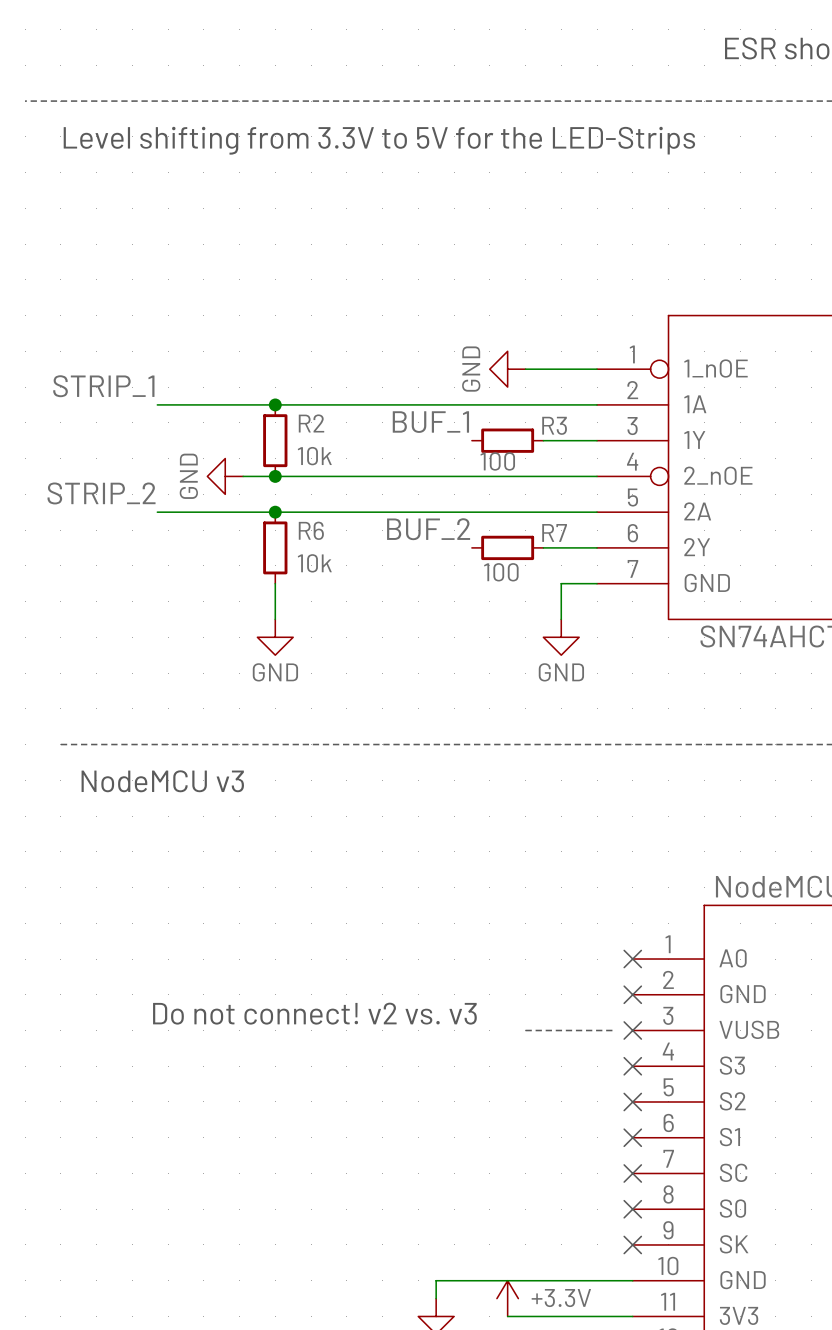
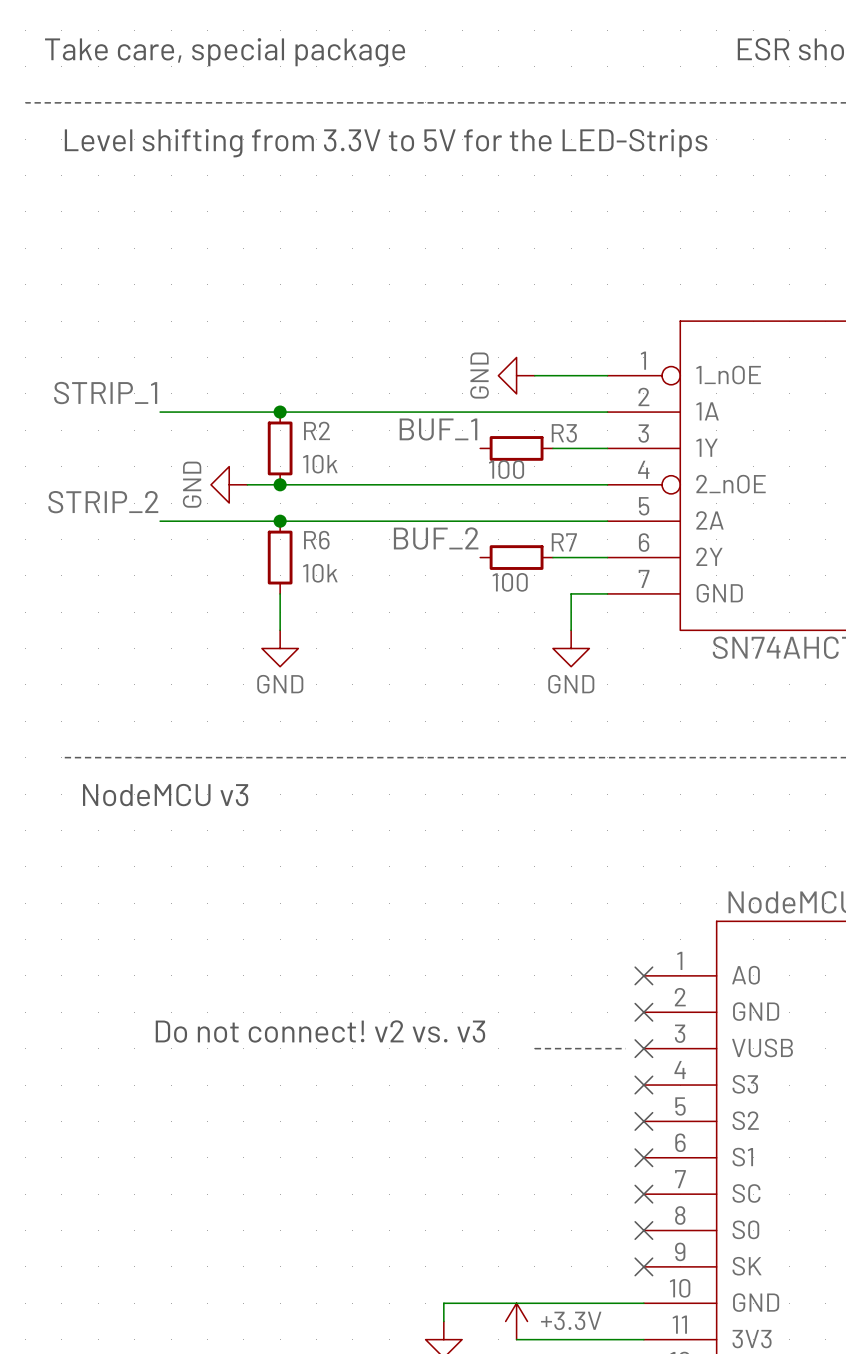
text: none -> Take care, special package (225, 52)

